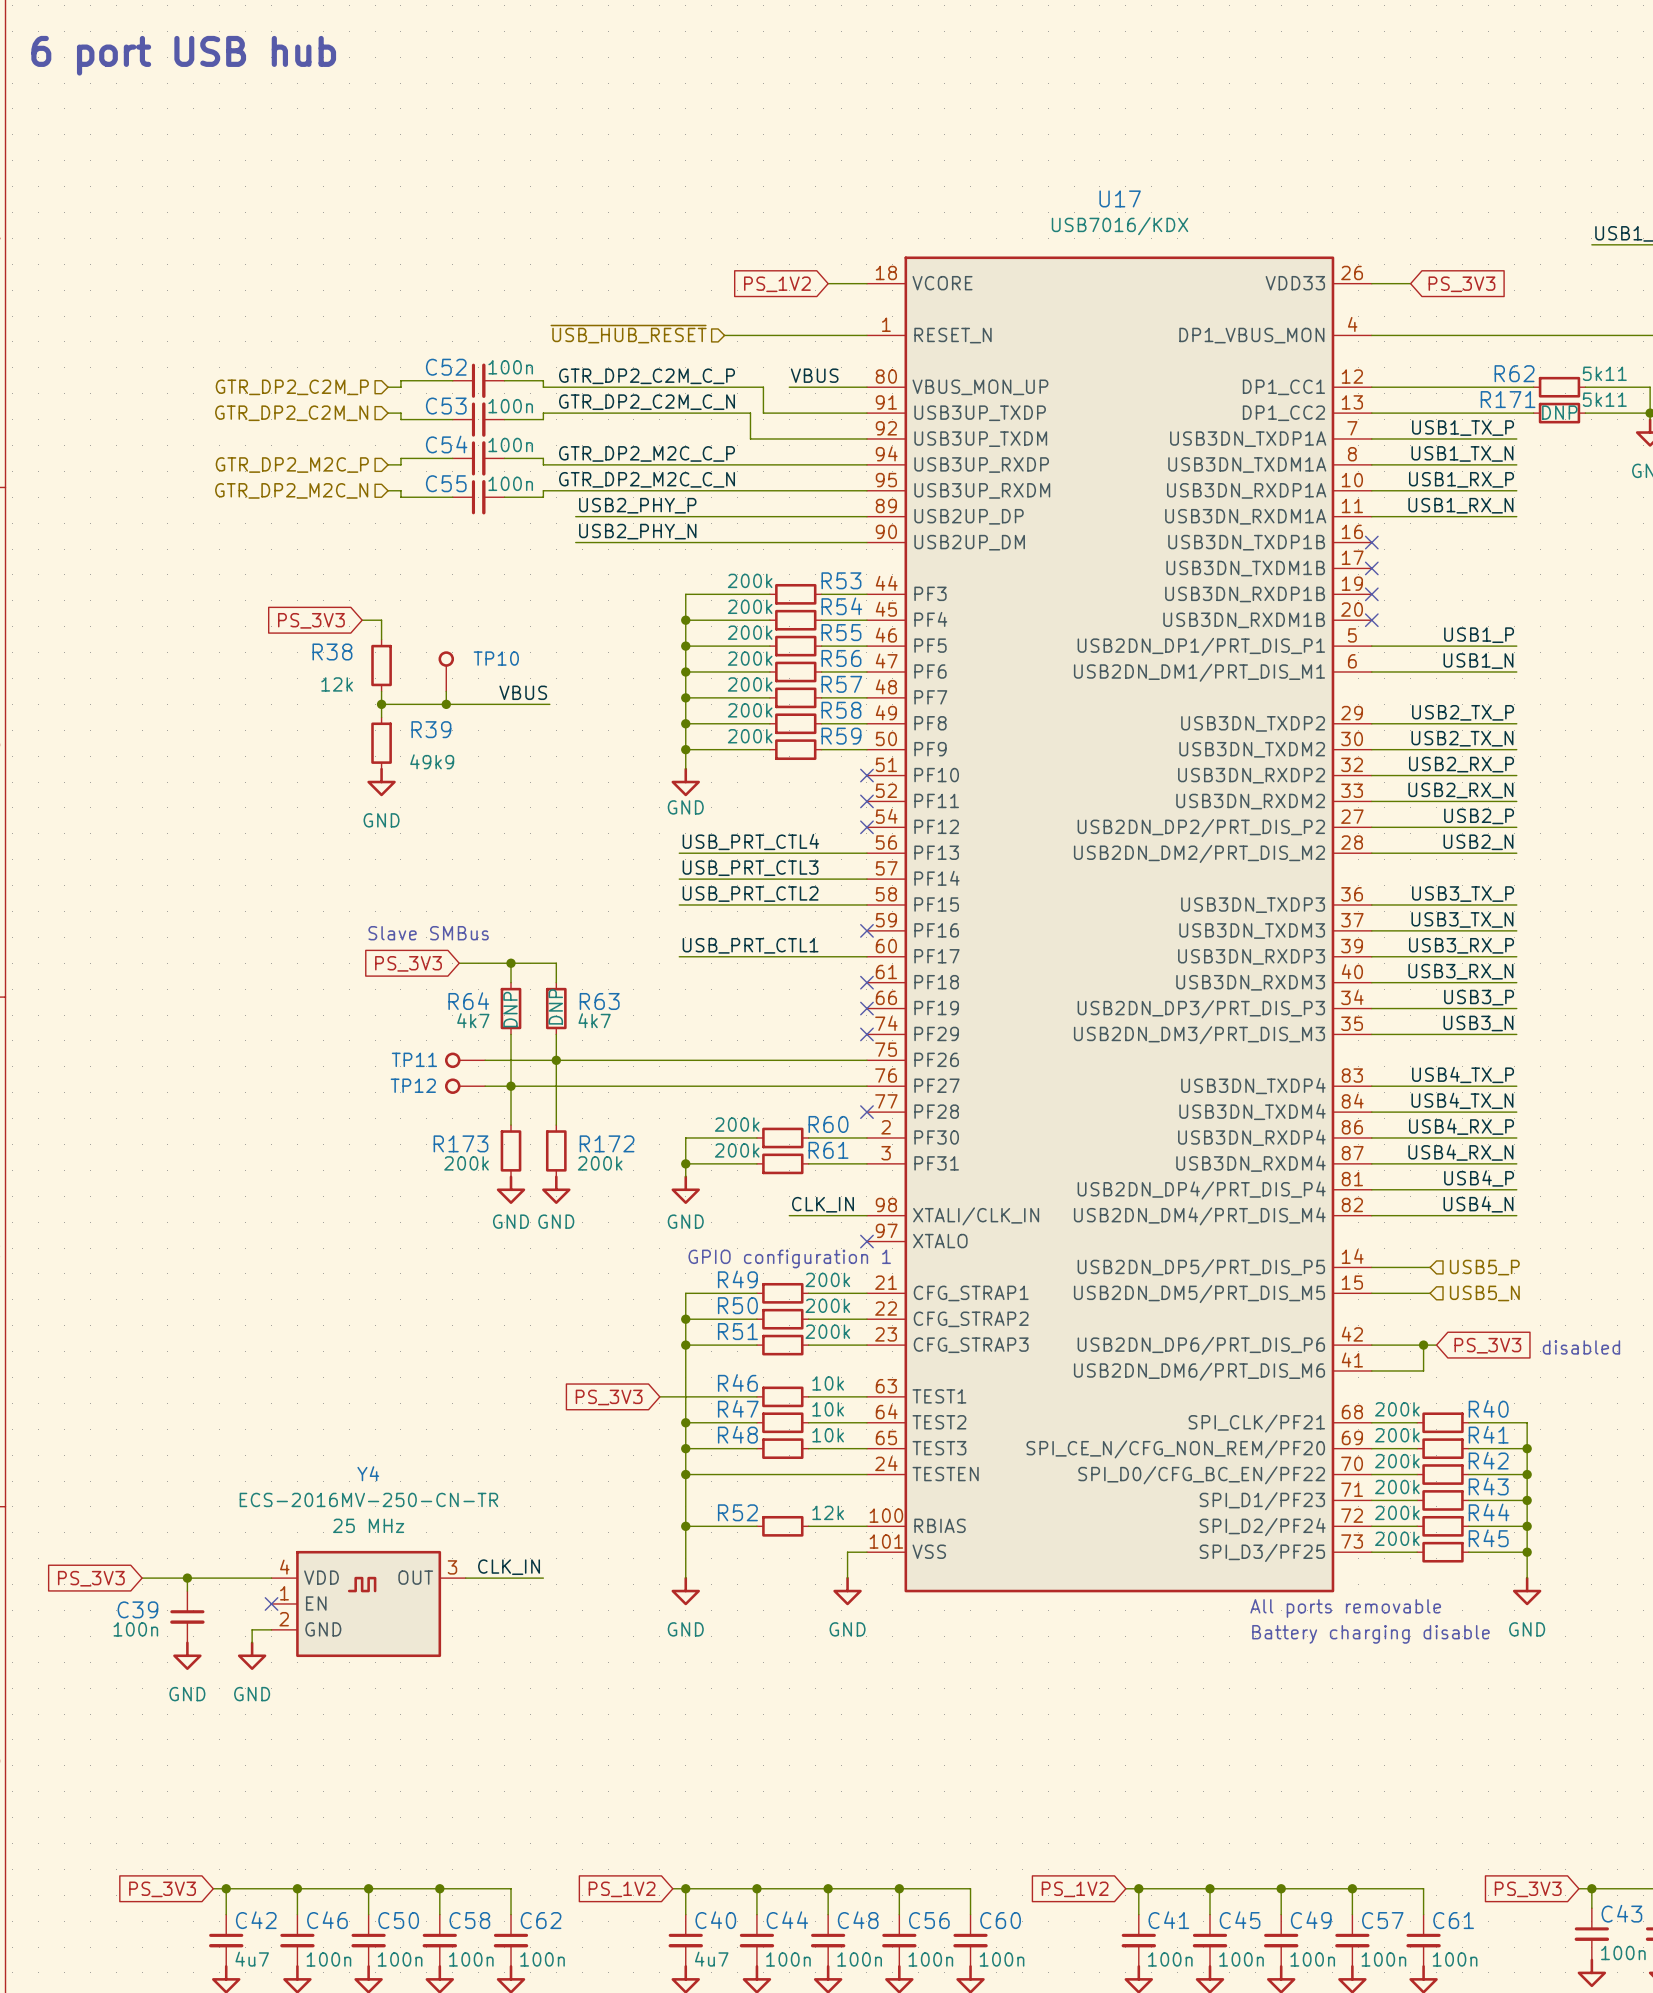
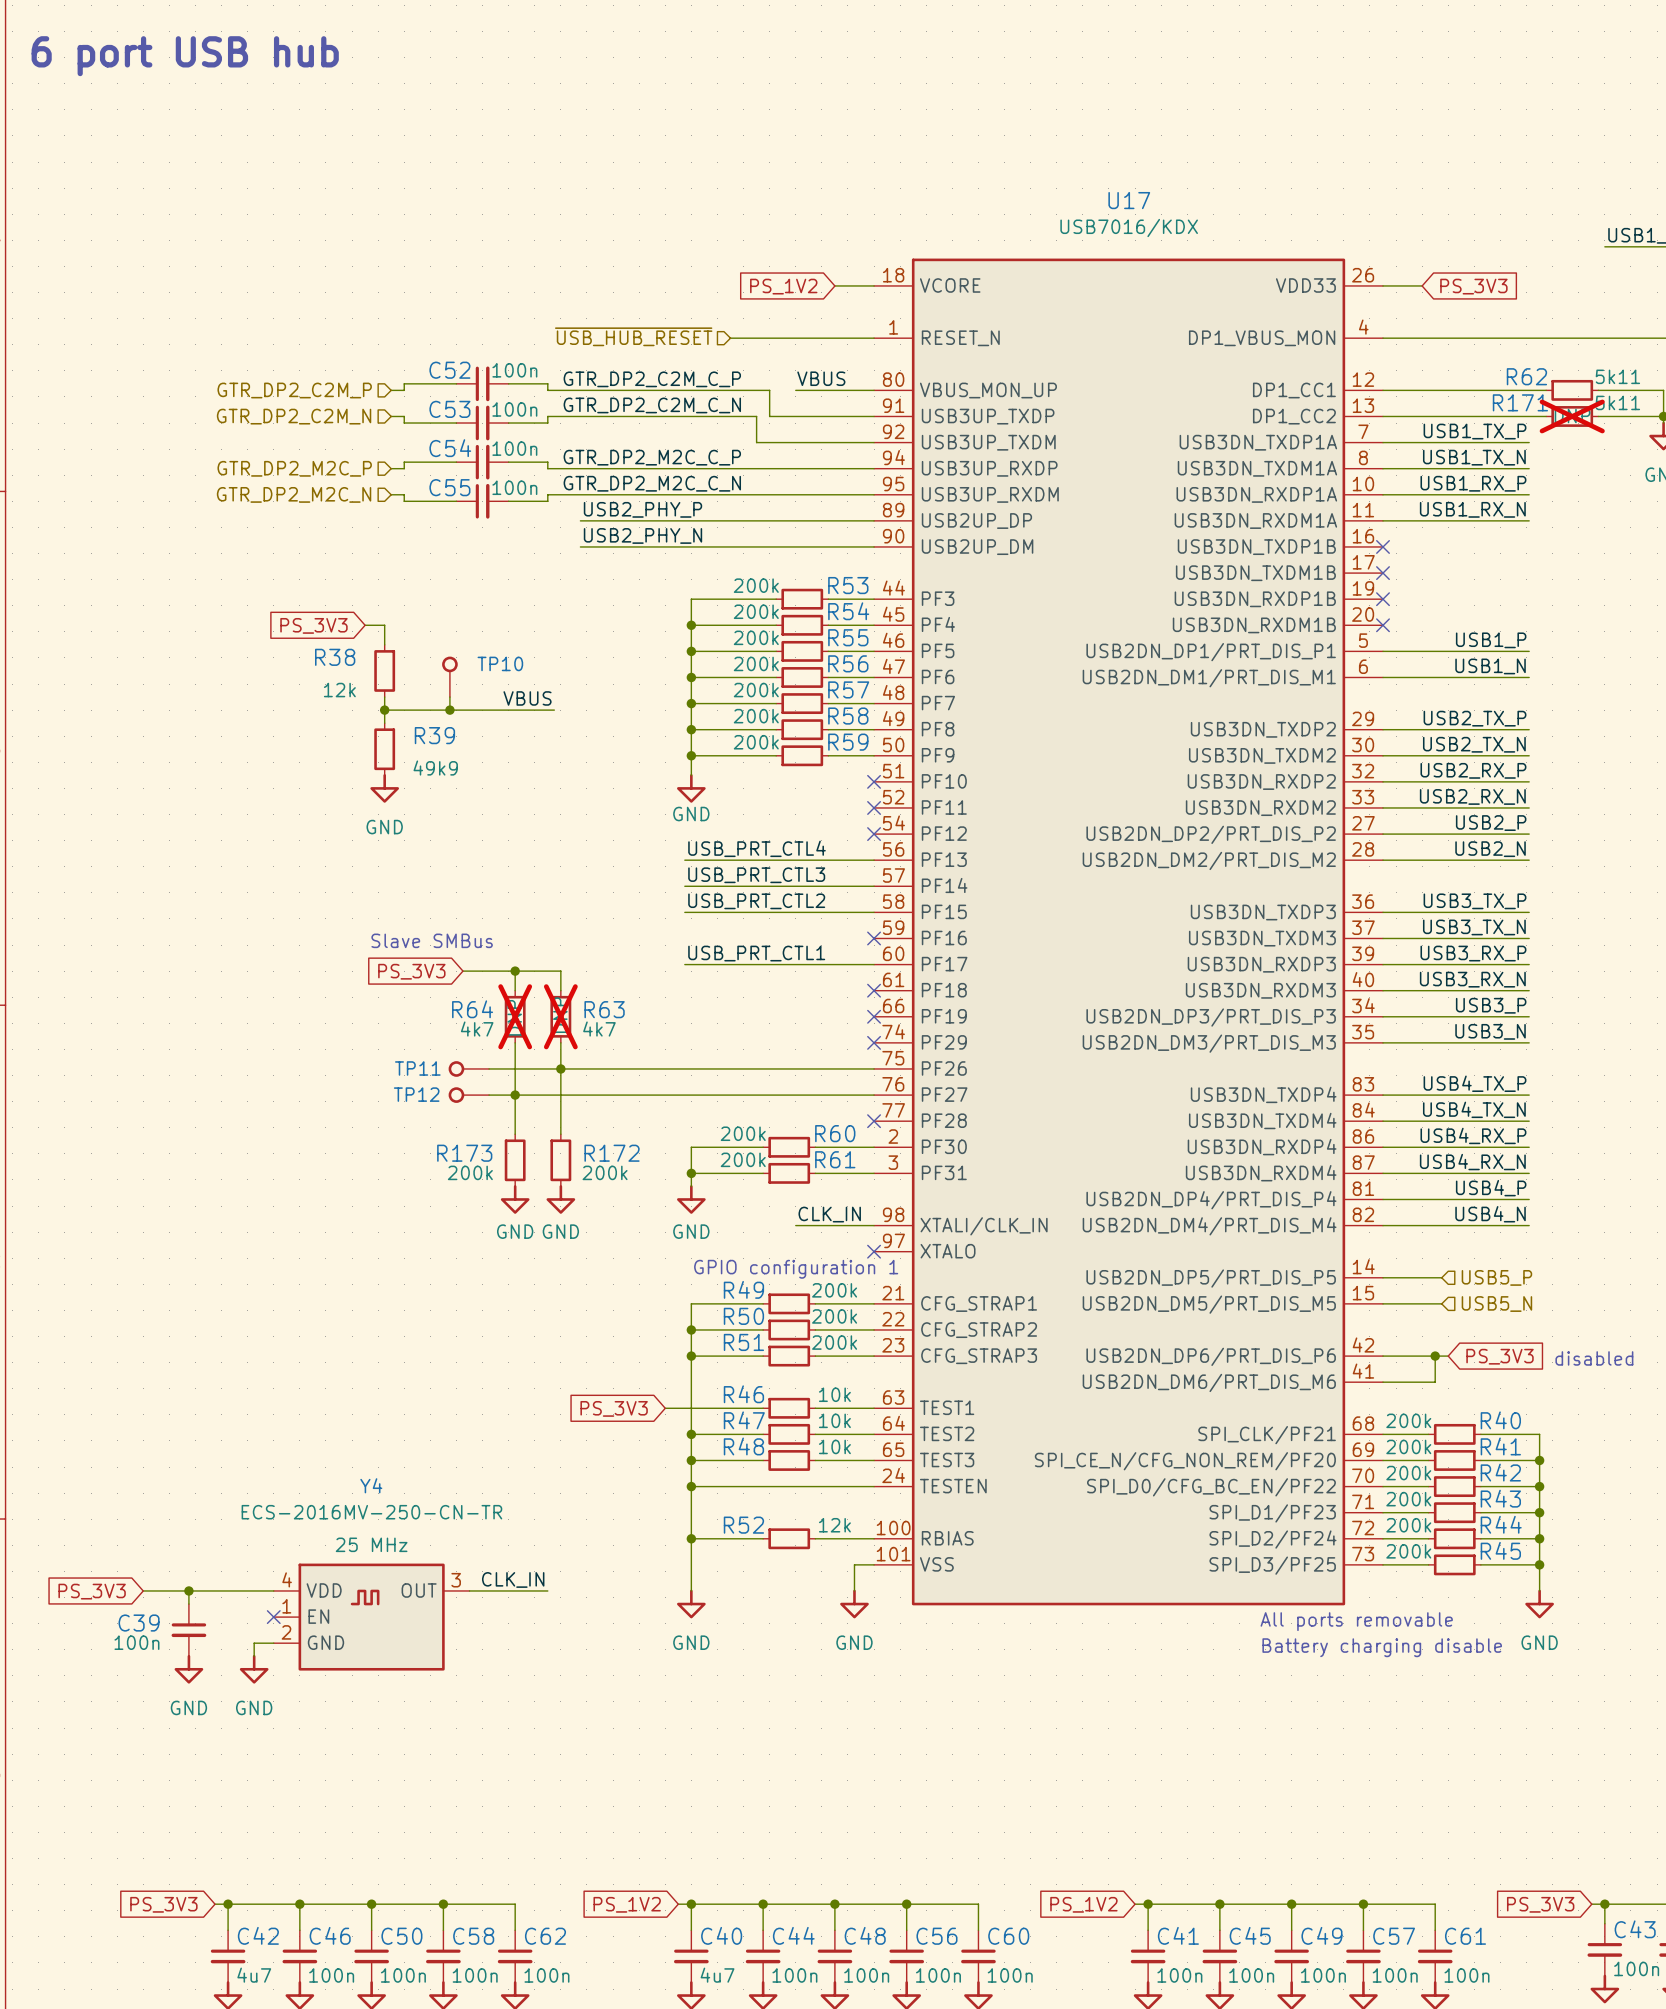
R171 do-not-place cross: none -> (1572, 416)
R64 do-not-place cross: none -> (515, 1016)
R63 do-not-place cross: none -> (560, 1016)
Y4 text: 25 MHz (368, 1525) -> none
Y4 text: none -> 25 MHz (371, 1544)

